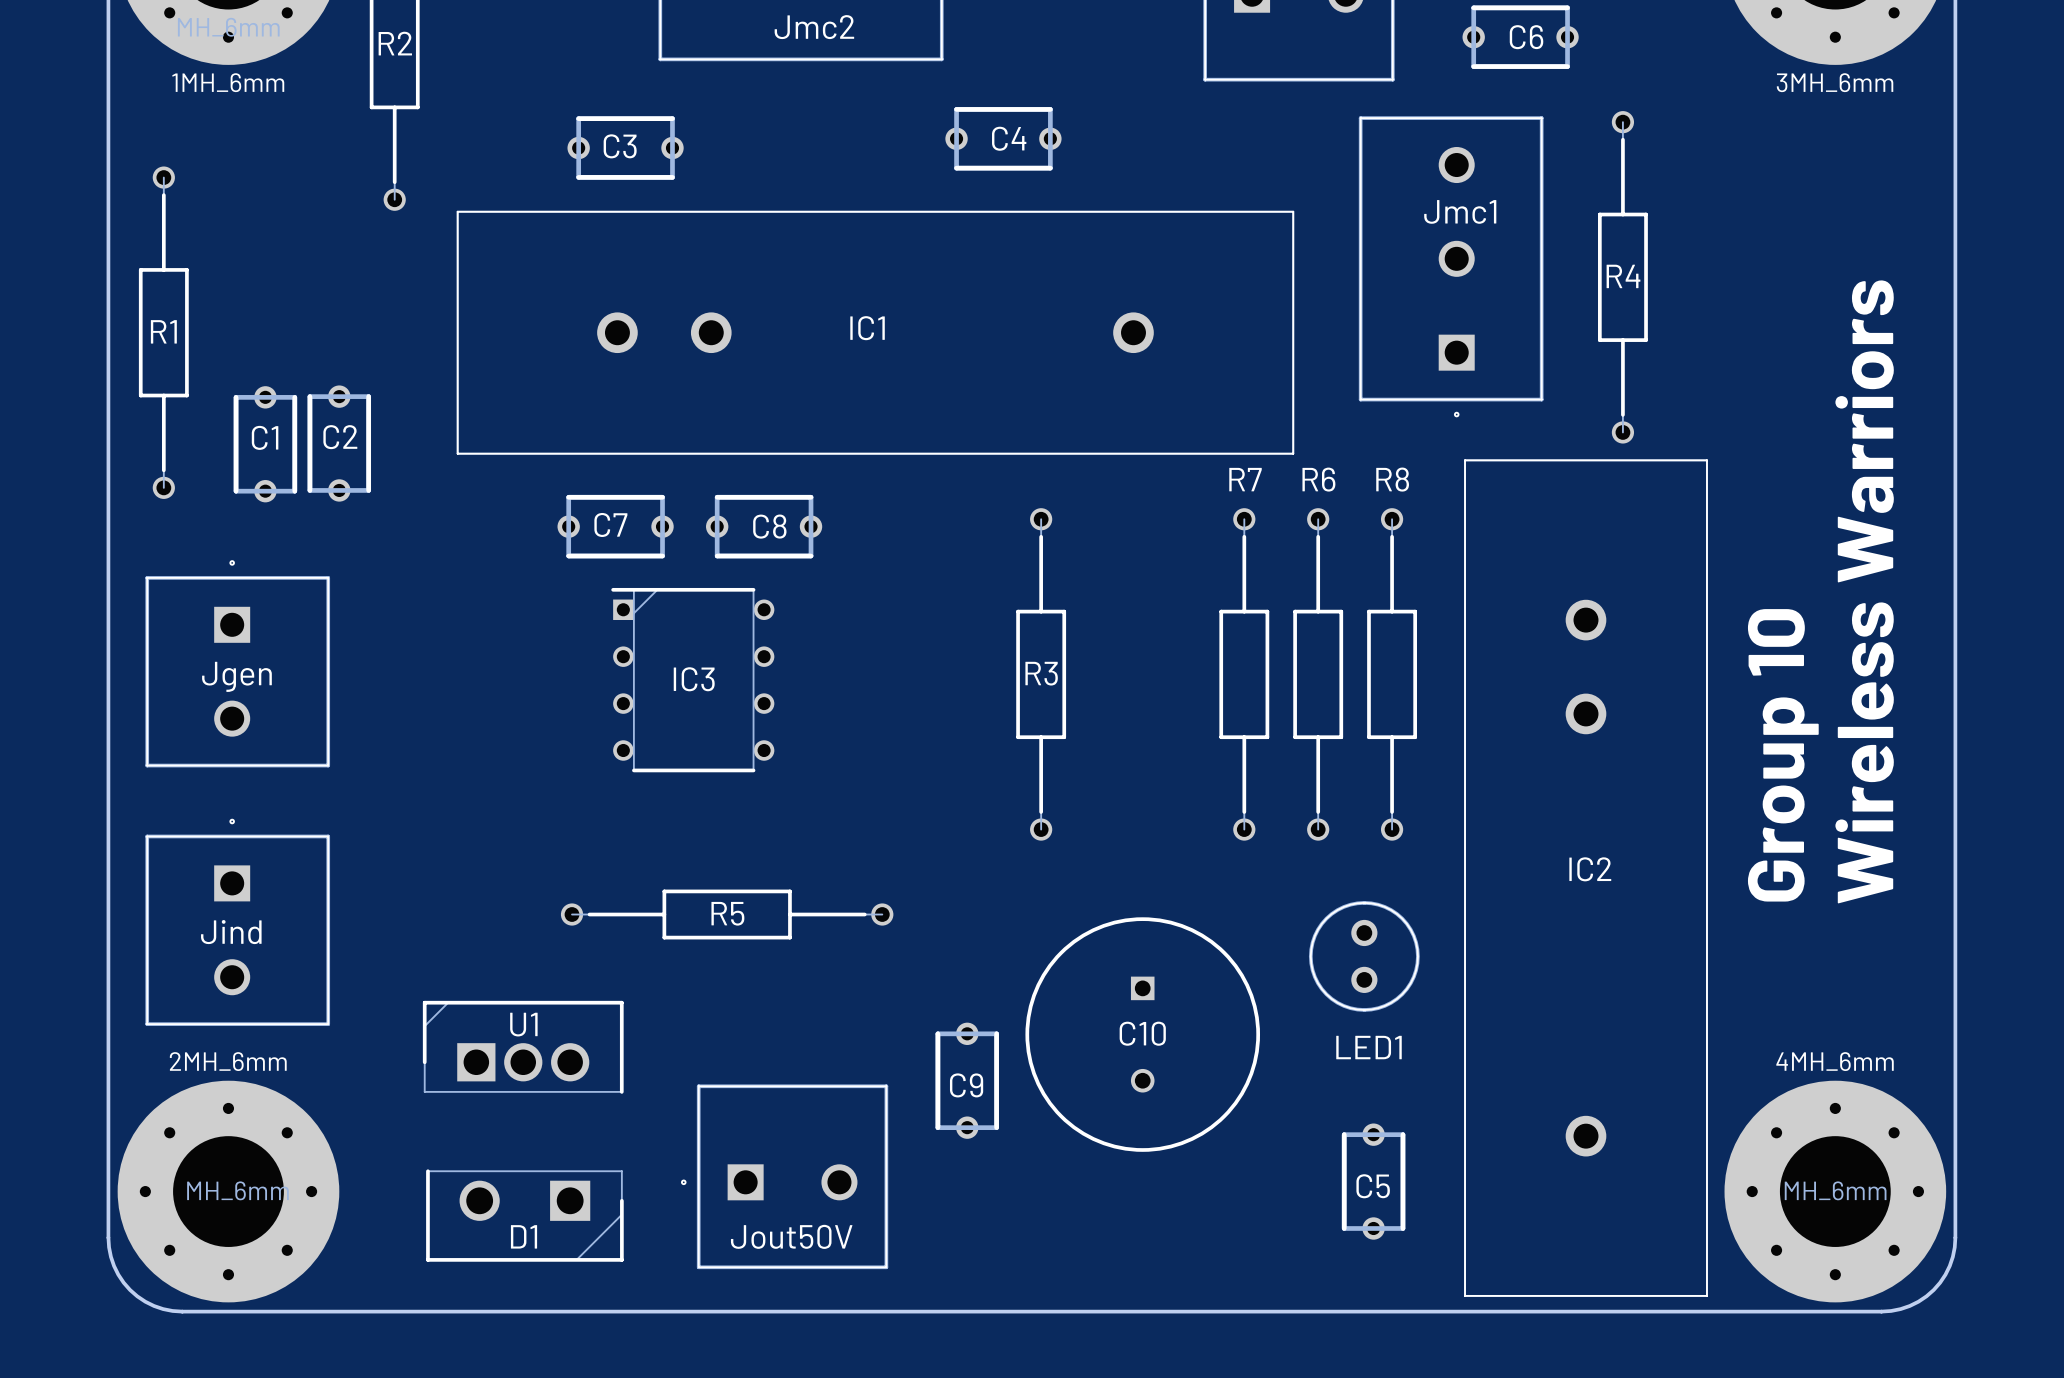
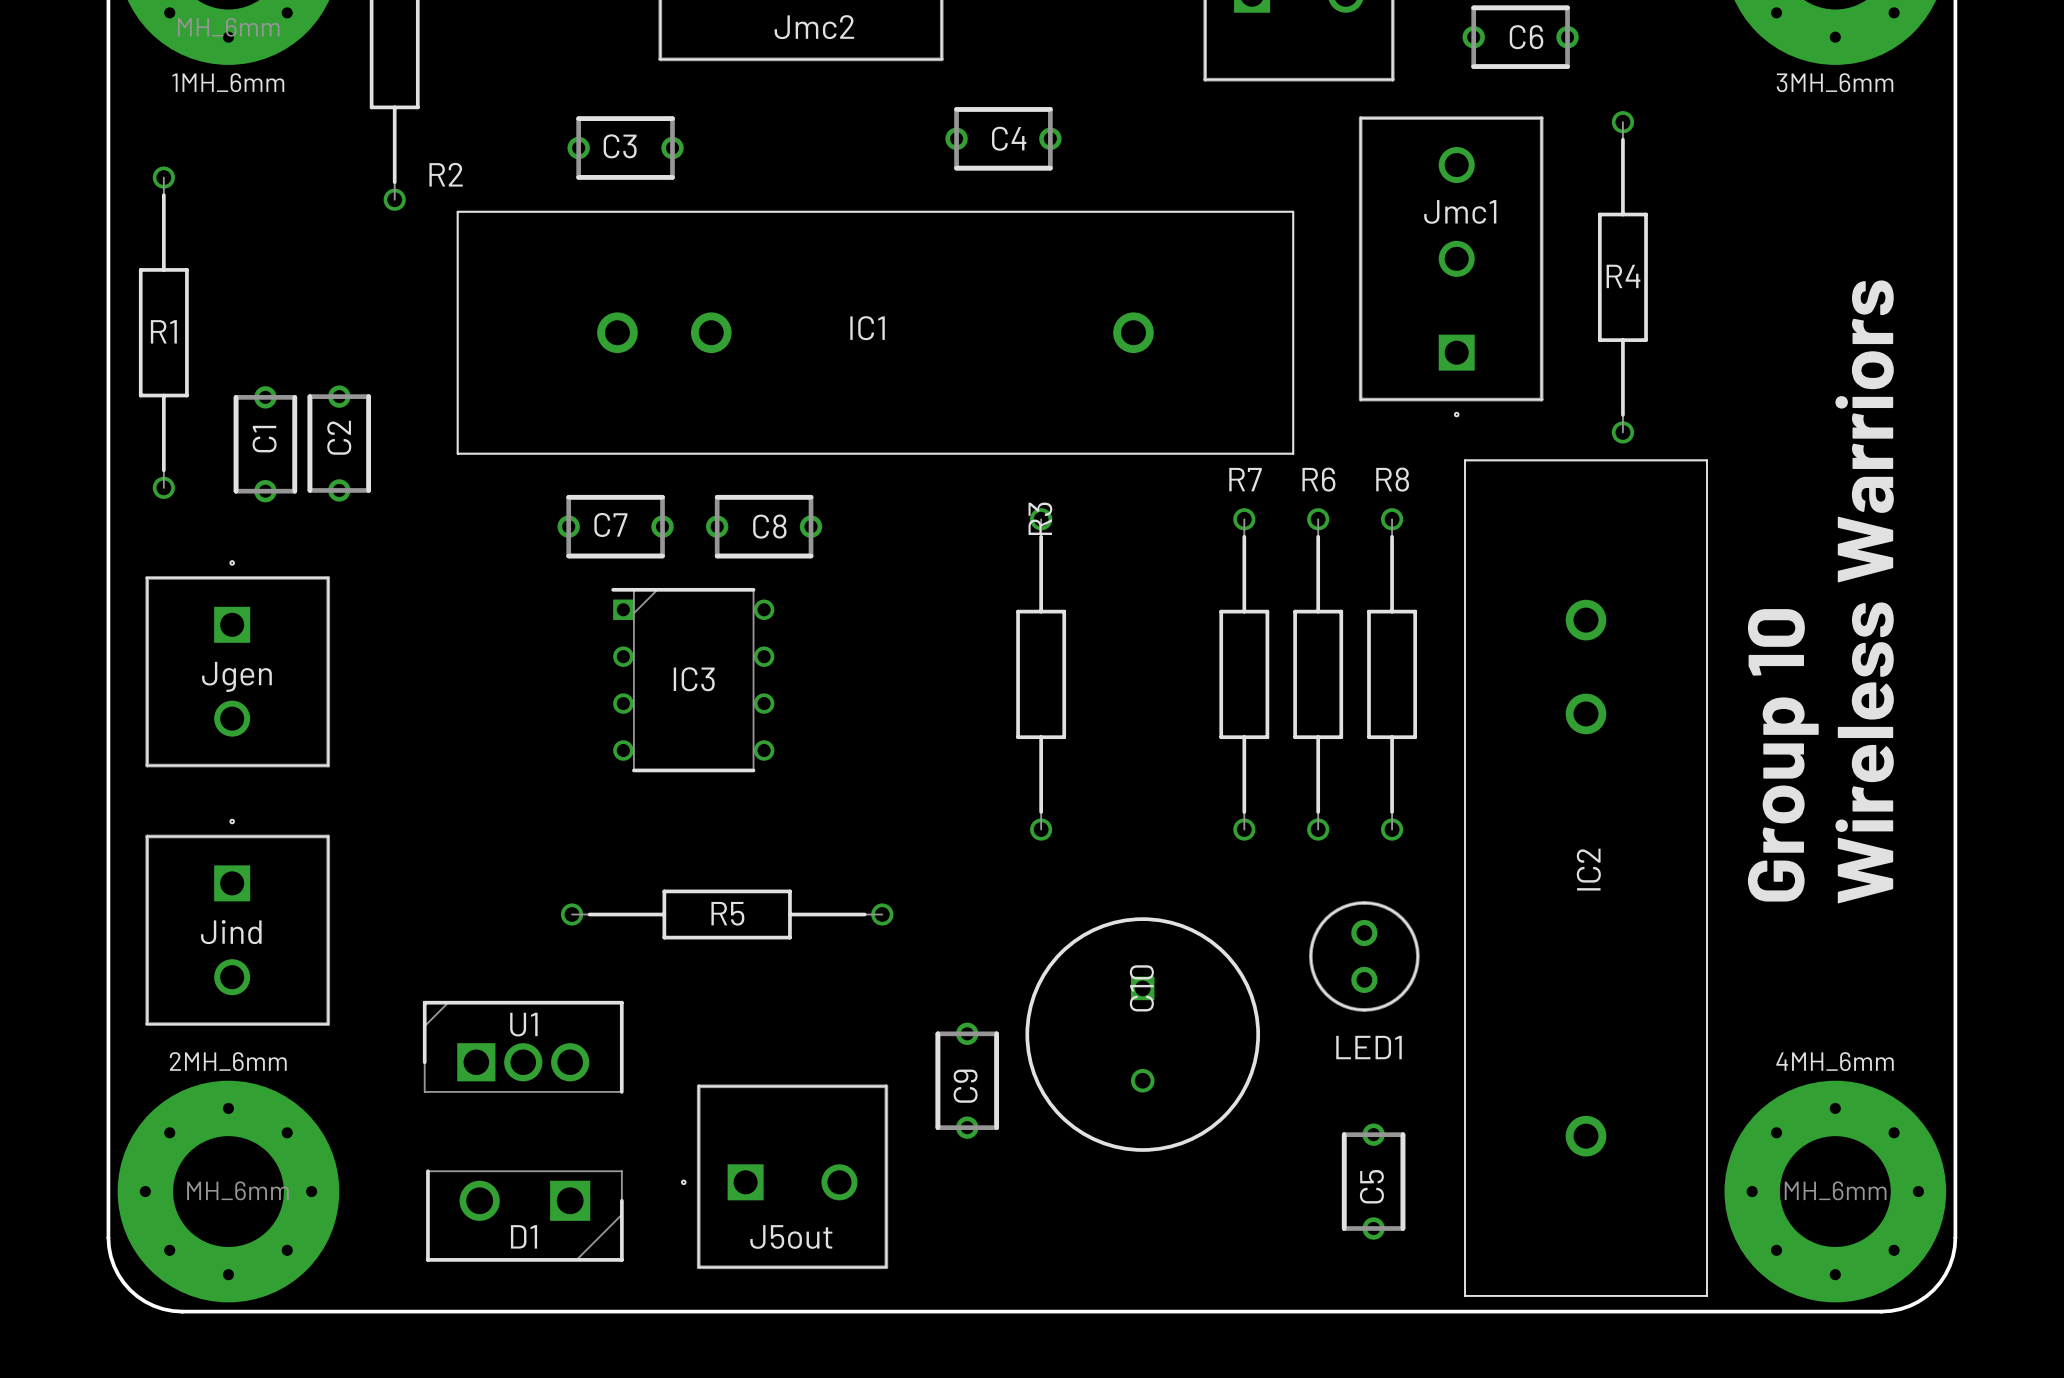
R2 name position: R2 (395, 43) -> R2 (446, 174)
C1 name rotation: 0° (265, 437) -> 90° counterclockwise (264, 439)
C2 name rotation: 0° (340, 437) -> 90° counterclockwise (339, 437)
R3 name rotation: 0° (1041, 673) -> 90° counterclockwise (1040, 518)
R3 name position: R3 (1041, 673) -> R3 (1040, 518)
IC2 name rotation: 0° (1590, 869) -> 90° counterclockwise (1588, 869)
C10 name rotation: 0° (1142, 1033) -> 90° counterclockwise (1141, 988)
C9 name rotation: 0° (966, 1085) -> 90° counterclockwise (965, 1086)
C5 name rotation: 0° (1373, 1186) -> 90° counterclockwise (1371, 1186)
Jout50V name: Jout50V (791, 1236) -> J5out (791, 1236)

